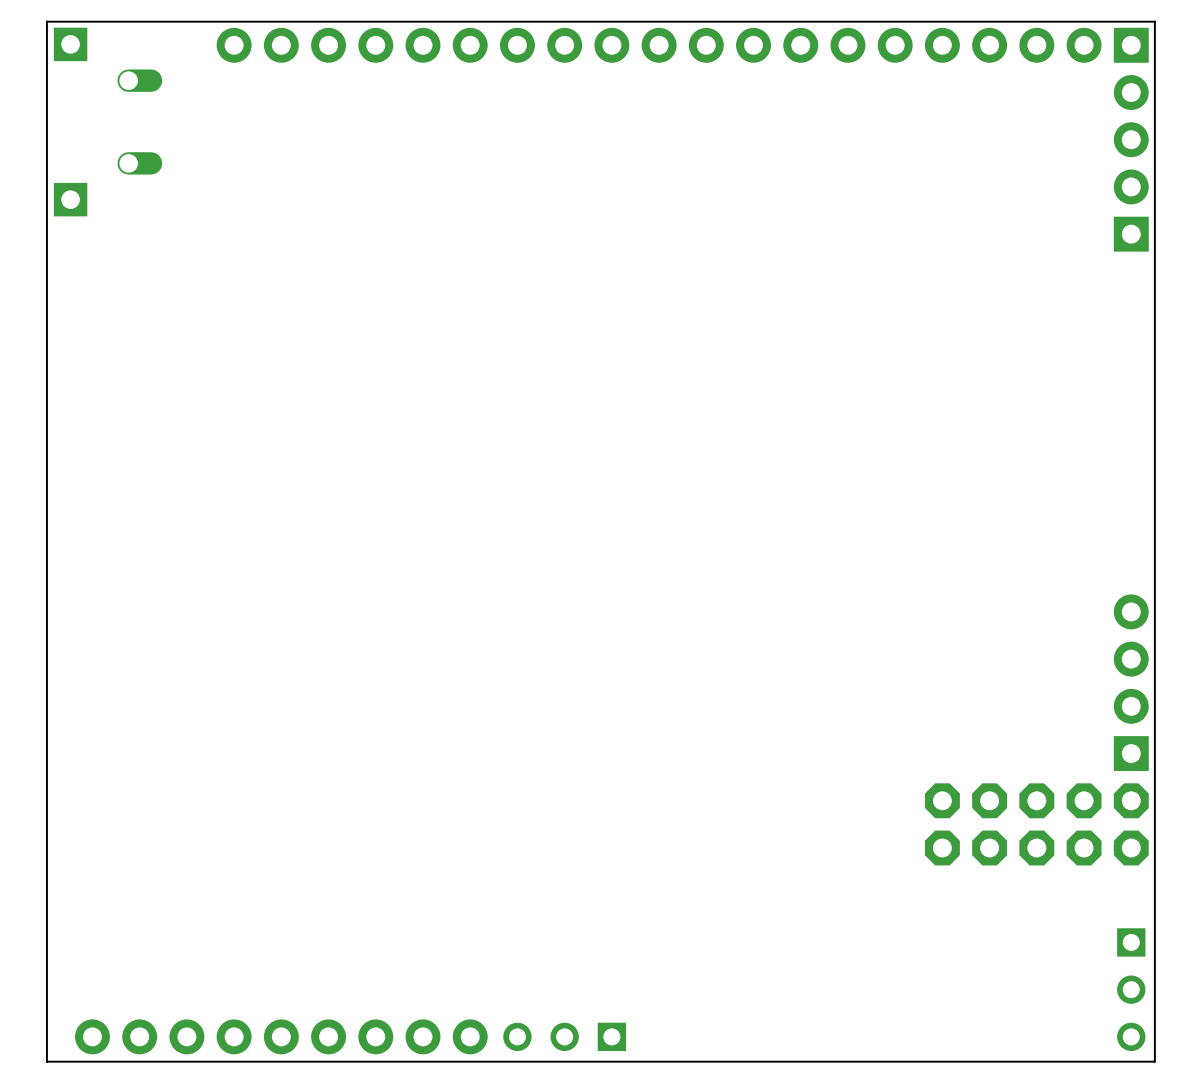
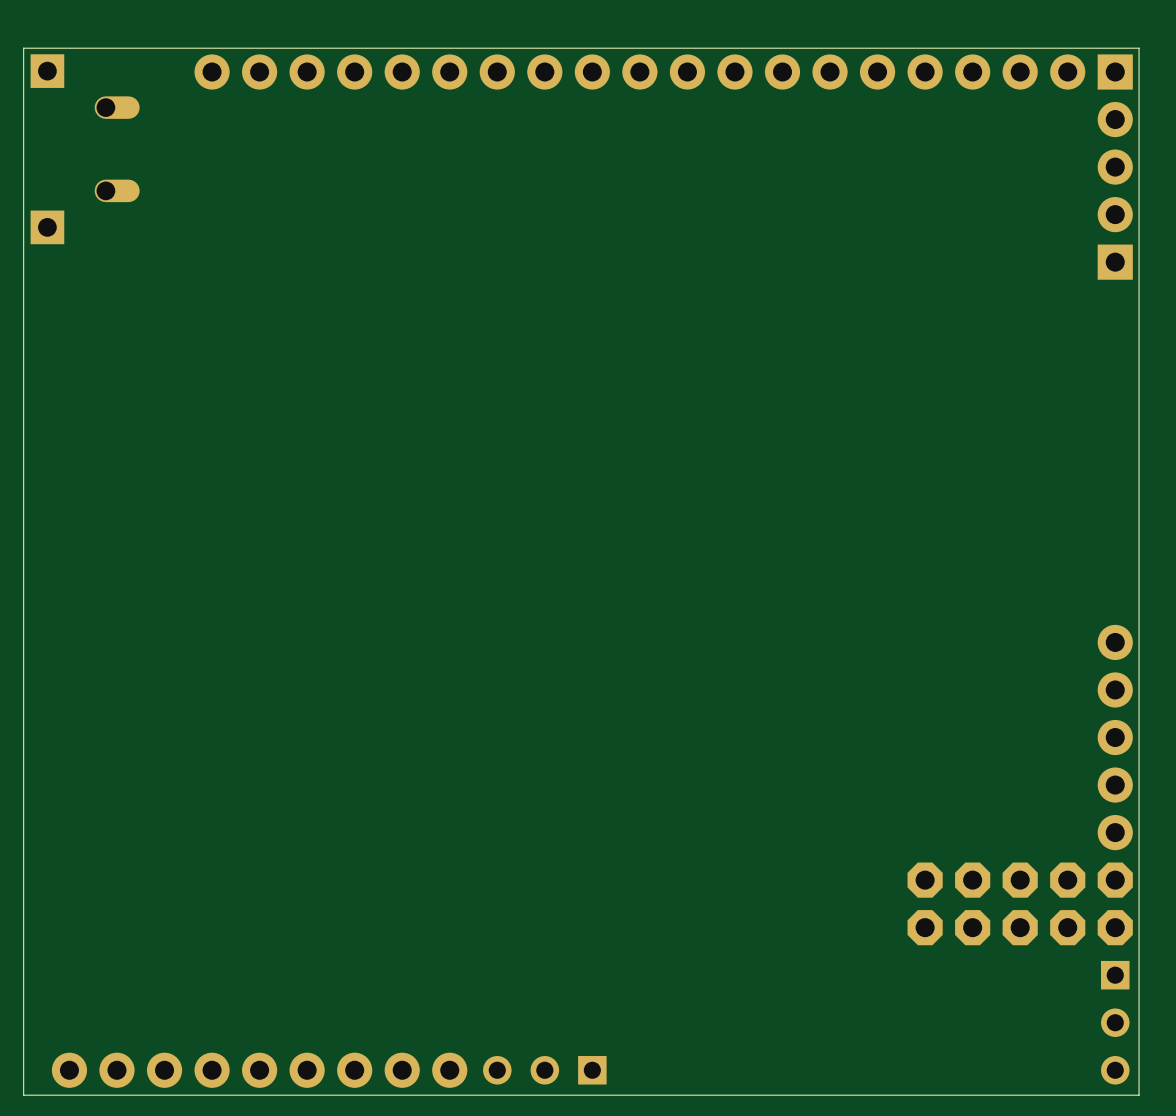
part: (1131, 682) -> none
part: none -> (1115, 737)
part position: (1036, 824) -> (1020, 903)

